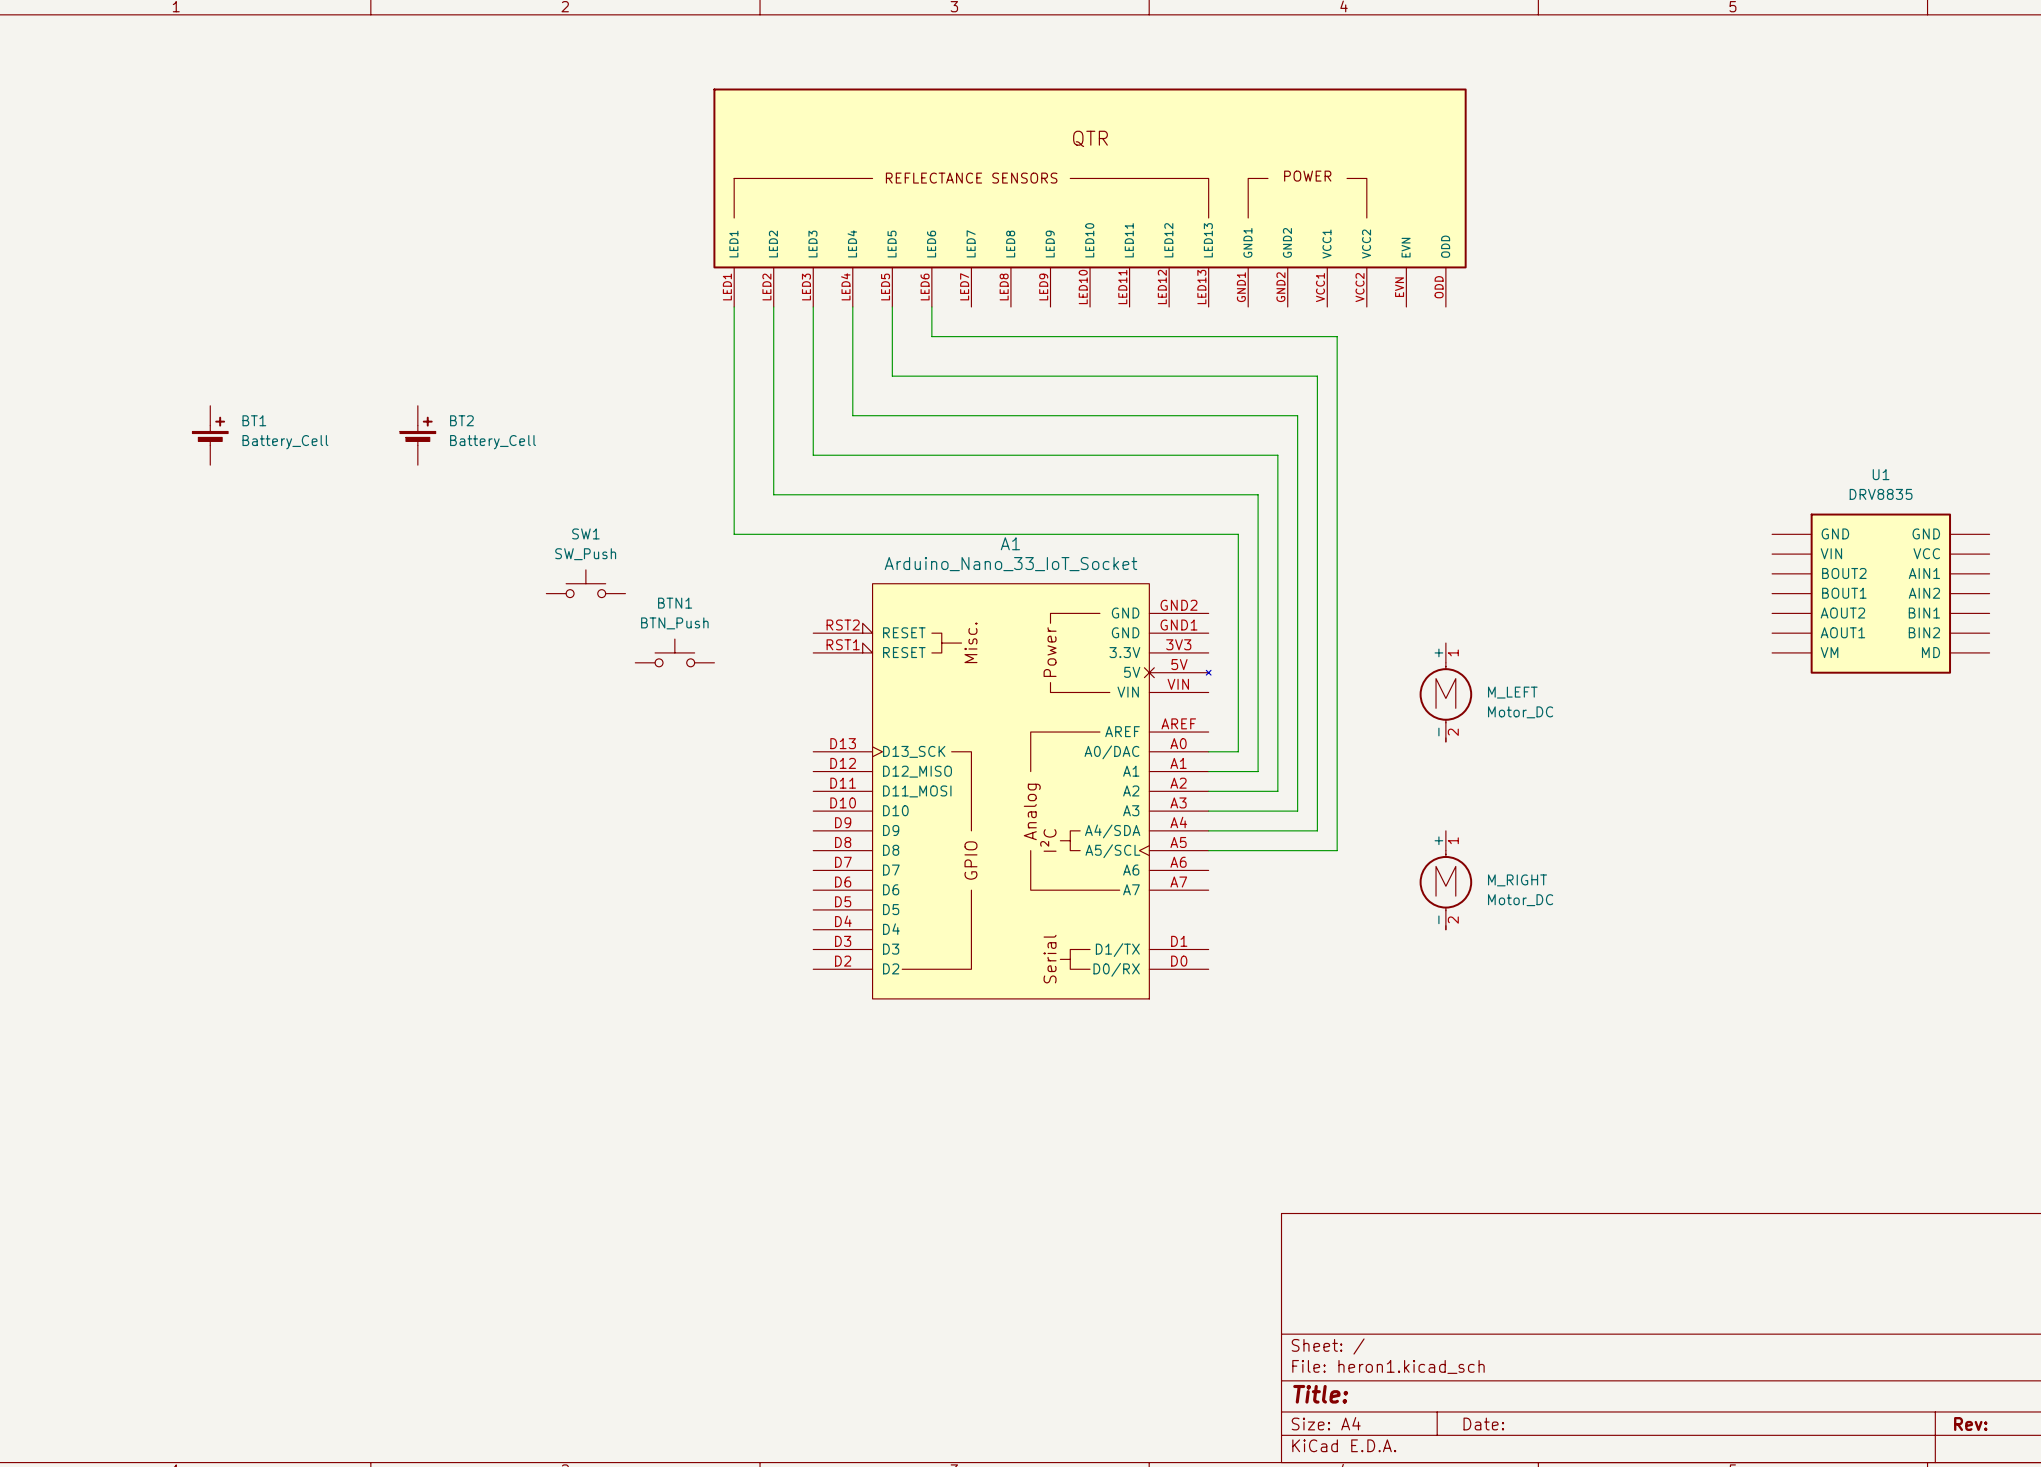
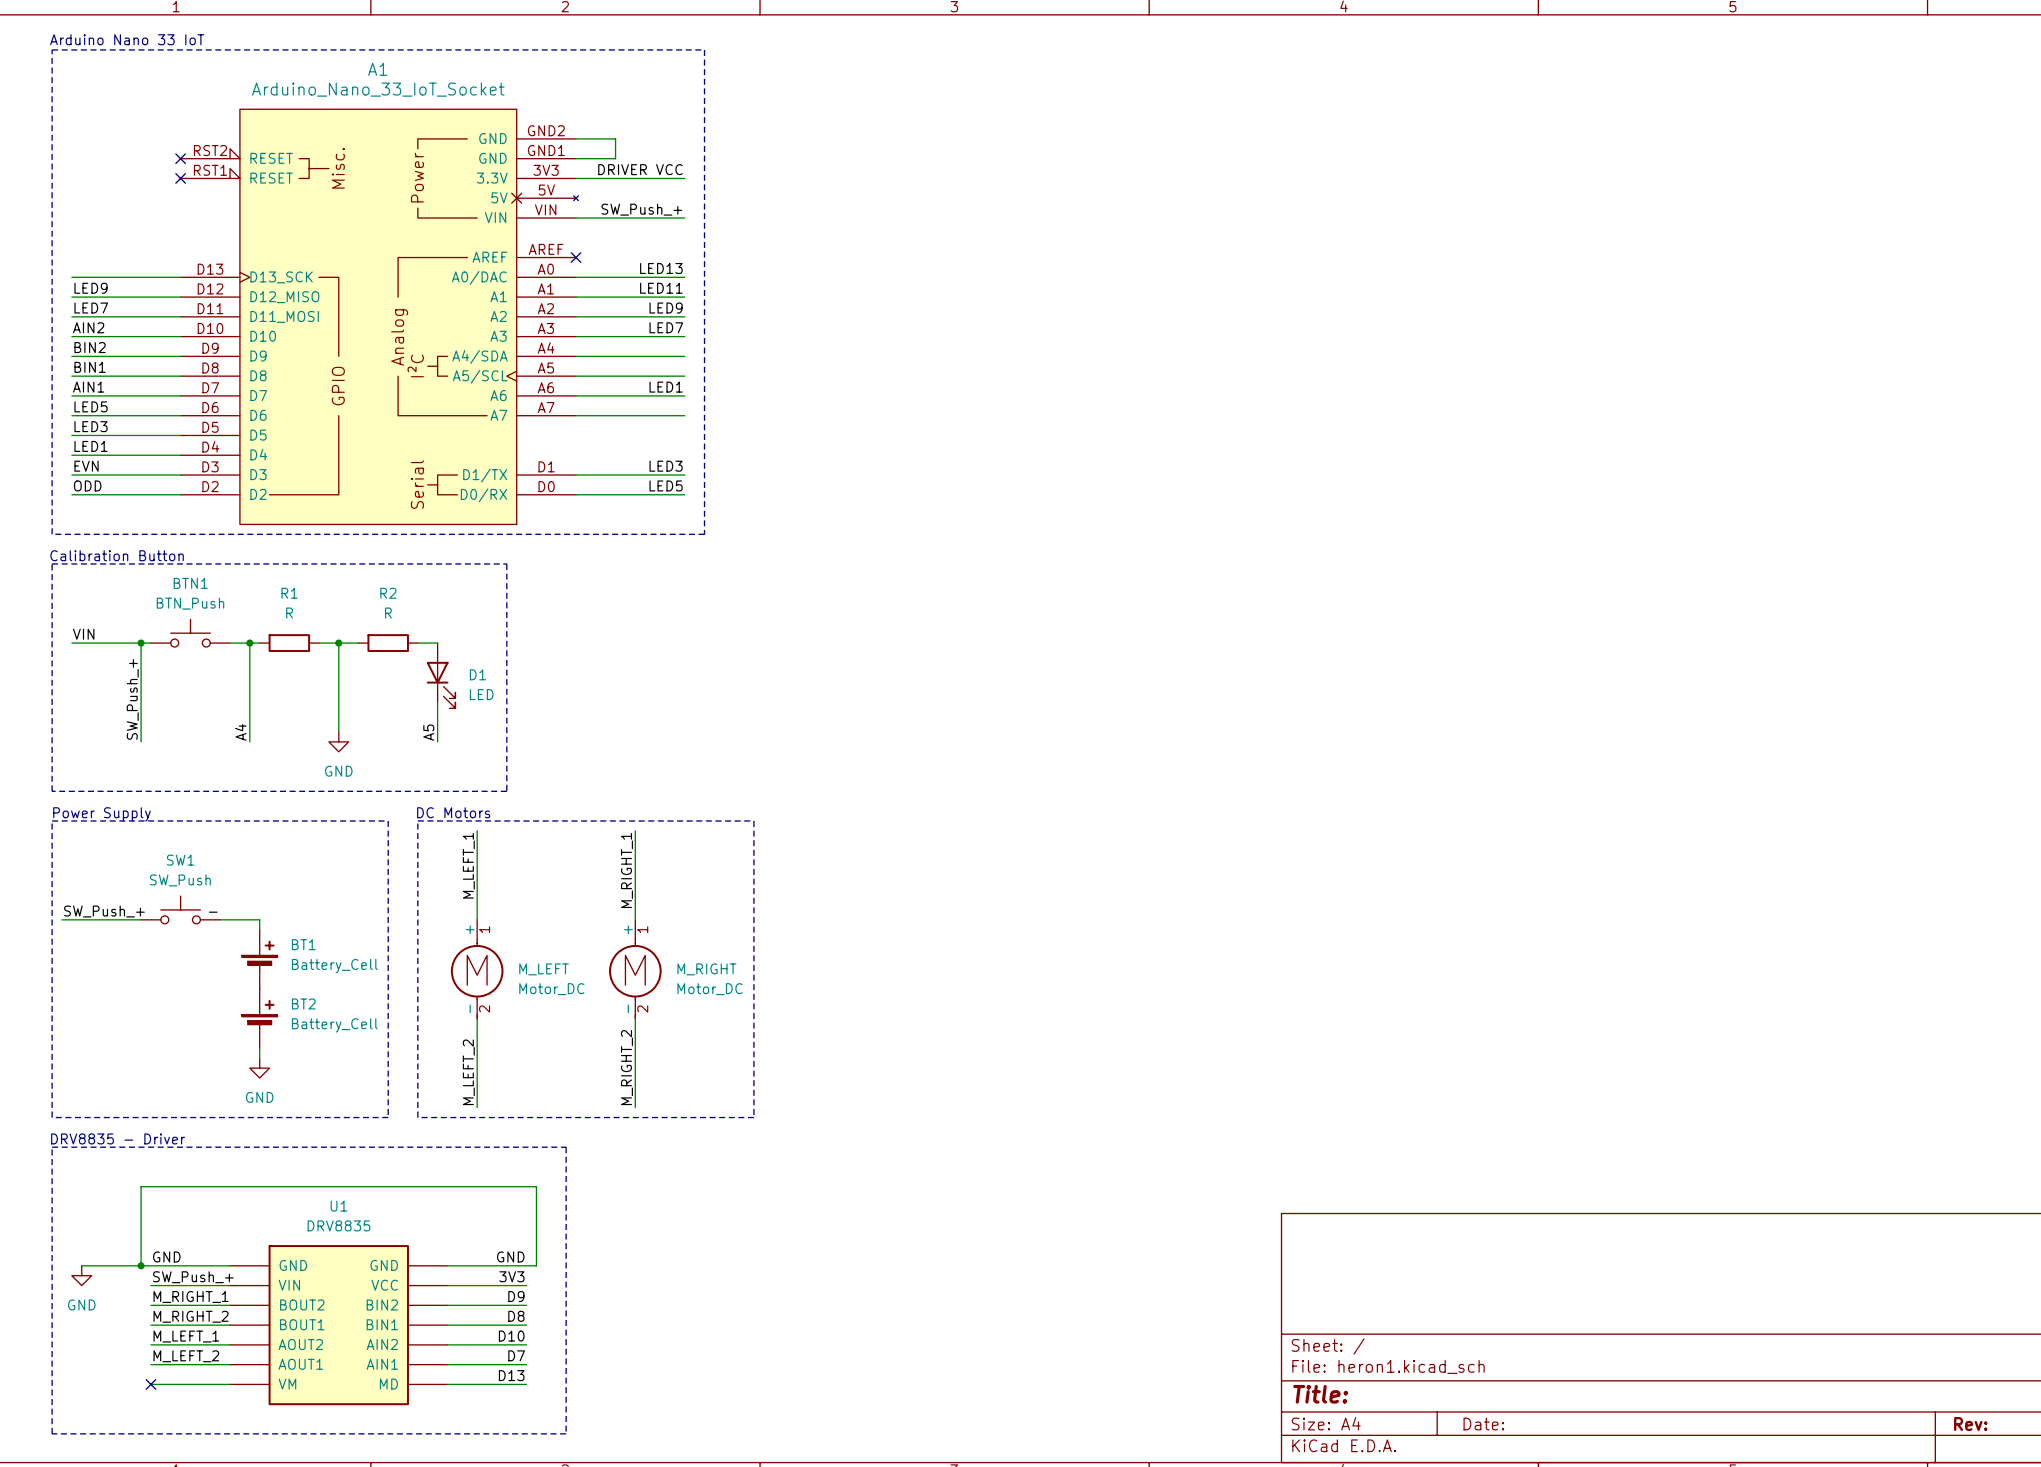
text: none -> Arduino Nano 33 IoT (127, 39)
line: none -> (52, 49) (52, 534) (704, 534) (704, 49) (52, 49)
wire: none -> (576, 138) (615, 138) (615, 158) (576, 158)
no-connect mark: none -> (180, 158)
label: none -> DRIVER VCC (640, 169)
no-connect mark: none -> (180, 178)
wire: none -> (576, 178) (684, 178)
part: (1090, 197) -> none
label: none -> SW_Push_+ (641, 209)
wire: none -> (576, 217) (684, 217)
no-connect mark: none -> (576, 257)
label: none -> LED13 (661, 268)
wire: none -> (71, 277) (180, 277)
wire: none -> (576, 277) (684, 277)
label: none -> LED9 (91, 288)
label: none -> LED11 (661, 288)
wire: none -> (71, 297) (180, 297)
wire: none -> (576, 297) (684, 297)
wire: (734, 306) (734, 534) (1238, 534) (1238, 751) (1208, 751) -> none
wire: (773, 306) (773, 494) (1258, 494) (1258, 771) (1208, 771) -> none
wire: (813, 306) (813, 455) (1277, 455) (1277, 791) (1208, 791) -> none
wire: (852, 306) (852, 415) (1297, 415) (1297, 811) (1208, 811) -> none
wire: (892, 306) (892, 376) (1317, 376) (1317, 830) (1208, 830) -> none
wire: (931, 306) (931, 336) (1337, 336) (1337, 850) (1208, 850) -> none
label: none -> LED7 (91, 308)
label: none -> LED9 (666, 308)
wire: none -> (71, 316) (180, 316)
wire: none -> (576, 316) (684, 316)
label: none -> AIN2 (88, 327)
label: none -> LED7 (666, 327)
wire: none -> (71, 336) (180, 336)
wire: none -> (576, 336) (684, 336)
label: none -> BIN2 (90, 347)
wire: none -> (71, 356) (180, 356)
wire: none -> (576, 356) (684, 356)
label: none -> BIN1 (90, 367)
wire: none -> (71, 376) (180, 376)
wire: none -> (576, 376) (684, 376)
label: none -> AIN1 (88, 387)
label: none -> LED1 (666, 387)
wire: none -> (71, 395) (180, 395)
wire: none -> (576, 395) (684, 395)
label: none -> LED5 (91, 406)
wire: none -> (71, 415) (180, 415)
wire: none -> (576, 415) (684, 415)
label: none -> LED3 (91, 426)
wire: none -> (71, 435) (180, 435)
BT1 position: (210, 435) -> (259, 959)
BT2 position: (417, 435) -> (259, 1018)
label: none -> LED1 (91, 446)
wire: none -> (71, 455) (180, 455)
label: none -> EVN (86, 466)
label: none -> LED3 (666, 466)
wire: none -> (71, 475) (180, 475)
wire: none -> (576, 475) (684, 475)
label: none -> ODD (87, 485)
label: none -> LED5 (666, 485)
wire: none -> (71, 494) (180, 494)
wire: none -> (576, 494) (684, 494)
text: none -> Calibration Button (117, 555)
line: none -> (52, 563) (52, 791) (506, 791) (506, 563) (52, 563)
U1 pin name: AIN1 (1924, 573) -> BIN2 (382, 1304)
SW1 position: (585, 583) -> (180, 909)
U1 position: (1880, 593) -> (338, 1325)
U1 pin name: AIN2 (1924, 593) -> BIN1 (382, 1324)
U1 pin name: BIN1 (1924, 613) -> AIN2 (382, 1344)
U1 pin name: BIN2 (1924, 632) -> AIN1 (382, 1364)
label: none -> VIN (83, 634)
wire: none -> (71, 643) (150, 643)
wire: none -> (141, 643) (141, 741)
junction: none -> (141, 643)
wire: none -> (230, 643) (259, 643)
wire: none -> (249, 643) (249, 741)
junction: none -> (249, 643)
R1: none -> R (289, 643)
wire: none -> (319, 643) (358, 643)
wire: none -> (338, 643) (338, 732)
junction: none -> (338, 643)
R2: none -> R (388, 643)
wire: none -> (417, 643) (437, 643)
BTN1 position: (674, 652) -> (190, 633)
D1: none -> LED (441, 675)
M_LEFT: Motor_DC (1445, 692) -> none
label: none -> SW_Push_+ (132, 699)
wire: none -> (437, 702) (437, 741)
label: none -> A4 (240, 732)
label: none -> A5 (428, 732)
power symbol: none -> GND (338, 741)
A1 position: (1012, 791) -> (379, 316)
text: none -> DC Motors (453, 812)
text: none -> Power Supply (102, 814)
line: none -> (52, 820) (52, 1117) (388, 1117) (388, 820) (52, 820)
line: none -> (417, 820) (753, 820) (753, 1117) (417, 1117) (417, 820)
wire: none -> (477, 830) (477, 919)
wire: none -> (635, 830) (635, 919)
label: none -> M_LEFT_1 (468, 865)
label: none -> M_RIGHT_1 (626, 870)
M_RIGHT: Motor_DC (1445, 880) -> none
label: none -> SW_Push_+ (104, 911)
label: none -> - (213, 912)
wire: none -> (61, 919) (141, 919)
wire: none -> (220, 919) (259, 919) (259, 929)
M_LEFT: none -> Motor_DC (477, 969)
M_RIGHT: none -> Motor_DC (635, 969)
wire: none -> (477, 1018) (477, 1107)
wire: none -> (635, 1018) (635, 1107)
wire: none -> (259, 1048) (259, 1058)
label: none -> M_RIGHT_2 (626, 1067)
power symbol: none -> GND (259, 1068)
label: none -> M_LEFT_2 (468, 1072)
text: none -> DRV8835 - Driver (118, 1138)
line: none -> (52, 1147) (566, 1147) (566, 1433) (52, 1433) (52, 1147)
label: none -> GND (166, 1256)
label: none -> GND (510, 1256)
wire: none -> (81, 1265) (230, 1265)
wire: none -> (141, 1265) (141, 1186) (536, 1186) (536, 1265) (447, 1265)
junction: none -> (141, 1265)
power symbol: none -> GND (81, 1275)
label: none -> 3V3 (511, 1276)
label: none -> SW_Push_+ (193, 1277)
wire: none -> (150, 1285) (230, 1285)
wire: none -> (447, 1285) (526, 1285)
label: none -> D9 (516, 1296)
label: none -> M_RIGHT_1 (191, 1297)
wire: none -> (150, 1305) (230, 1305)
wire: none -> (447, 1305) (526, 1305)
label: none -> M_RIGHT_2 (191, 1316)
label: none -> D8 (516, 1316)
wire: none -> (150, 1325) (230, 1325)
wire: none -> (447, 1325) (526, 1325)
label: none -> M_LEFT_1 (186, 1336)
label: none -> D10 (511, 1336)
wire: none -> (150, 1344) (230, 1344)
wire: none -> (447, 1344) (526, 1344)
label: none -> D7 (516, 1355)
label: none -> M_LEFT_2 (186, 1356)
wire: none -> (150, 1364) (230, 1364)
wire: none -> (447, 1364) (526, 1364)
label: none -> D13 (511, 1375)
wire: none -> (150, 1384) (230, 1384)
no-connect mark: none -> (150, 1384)
wire: none -> (447, 1384) (526, 1384)

